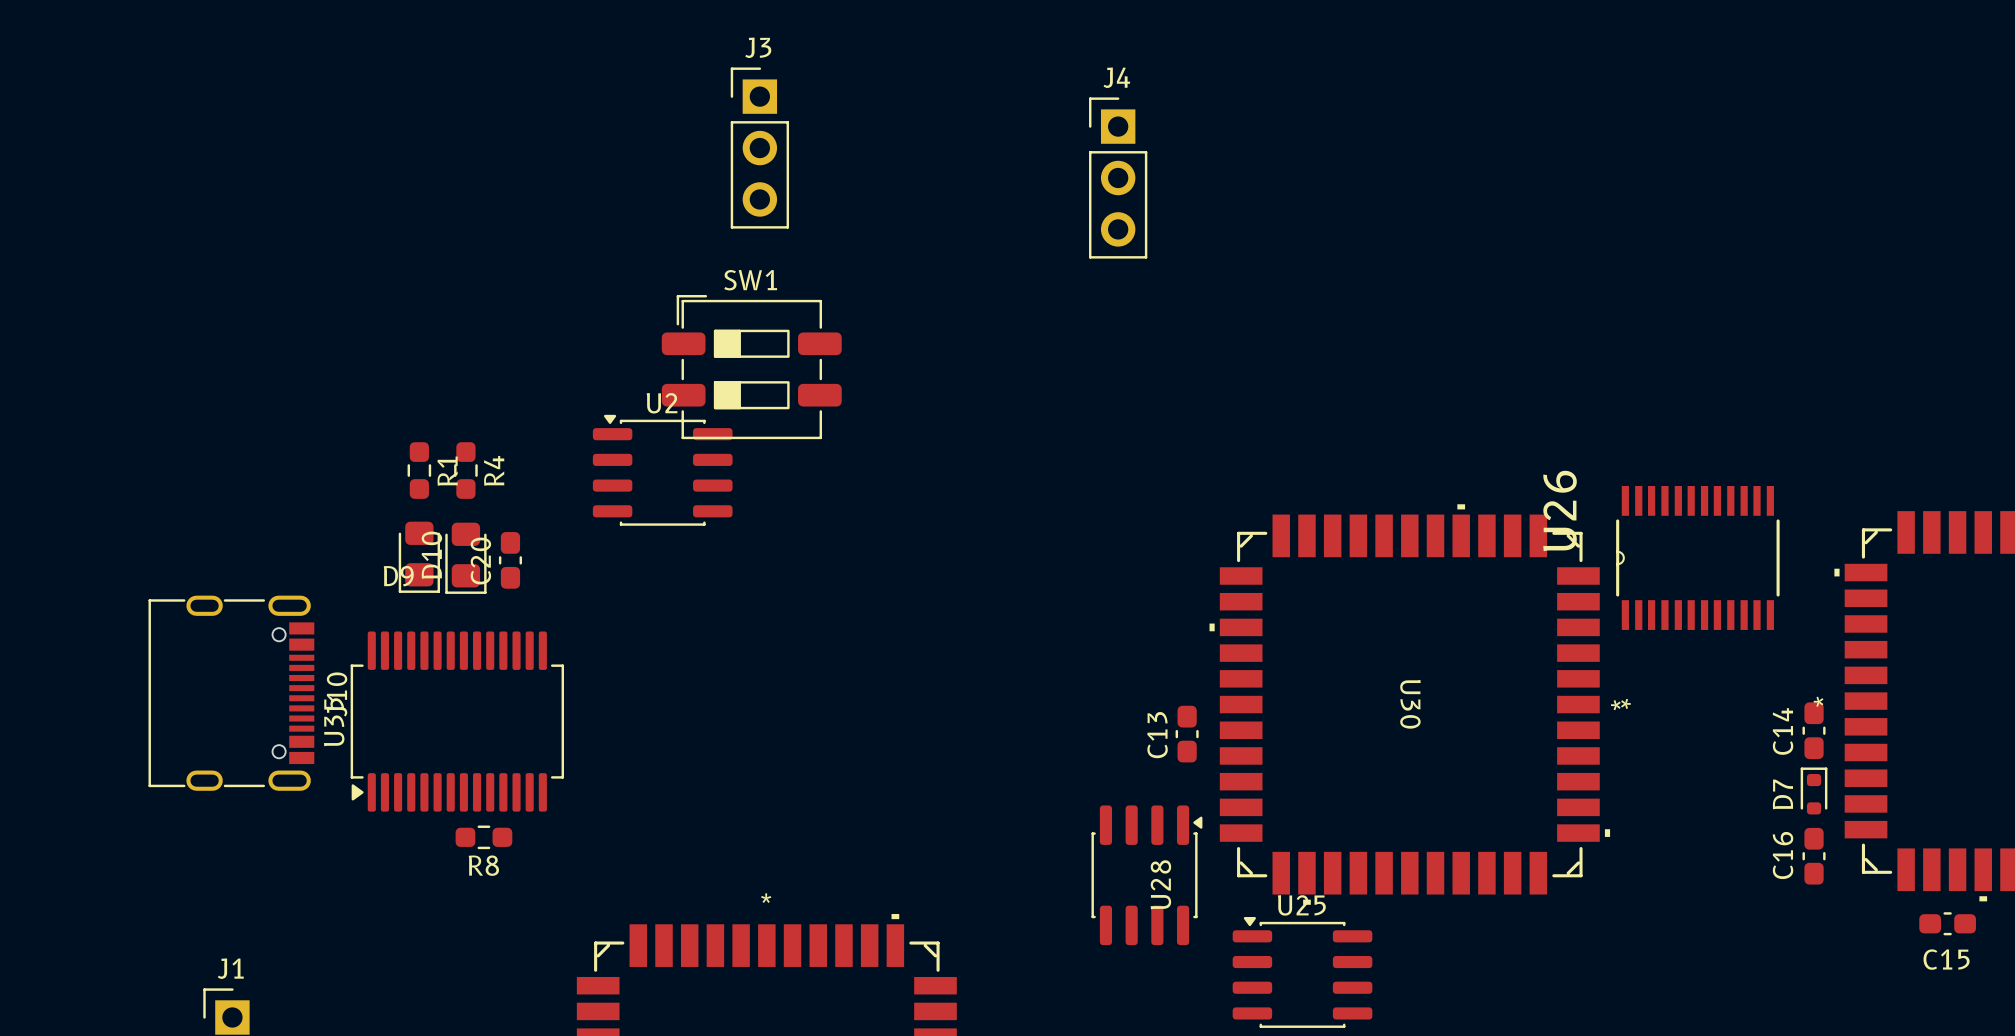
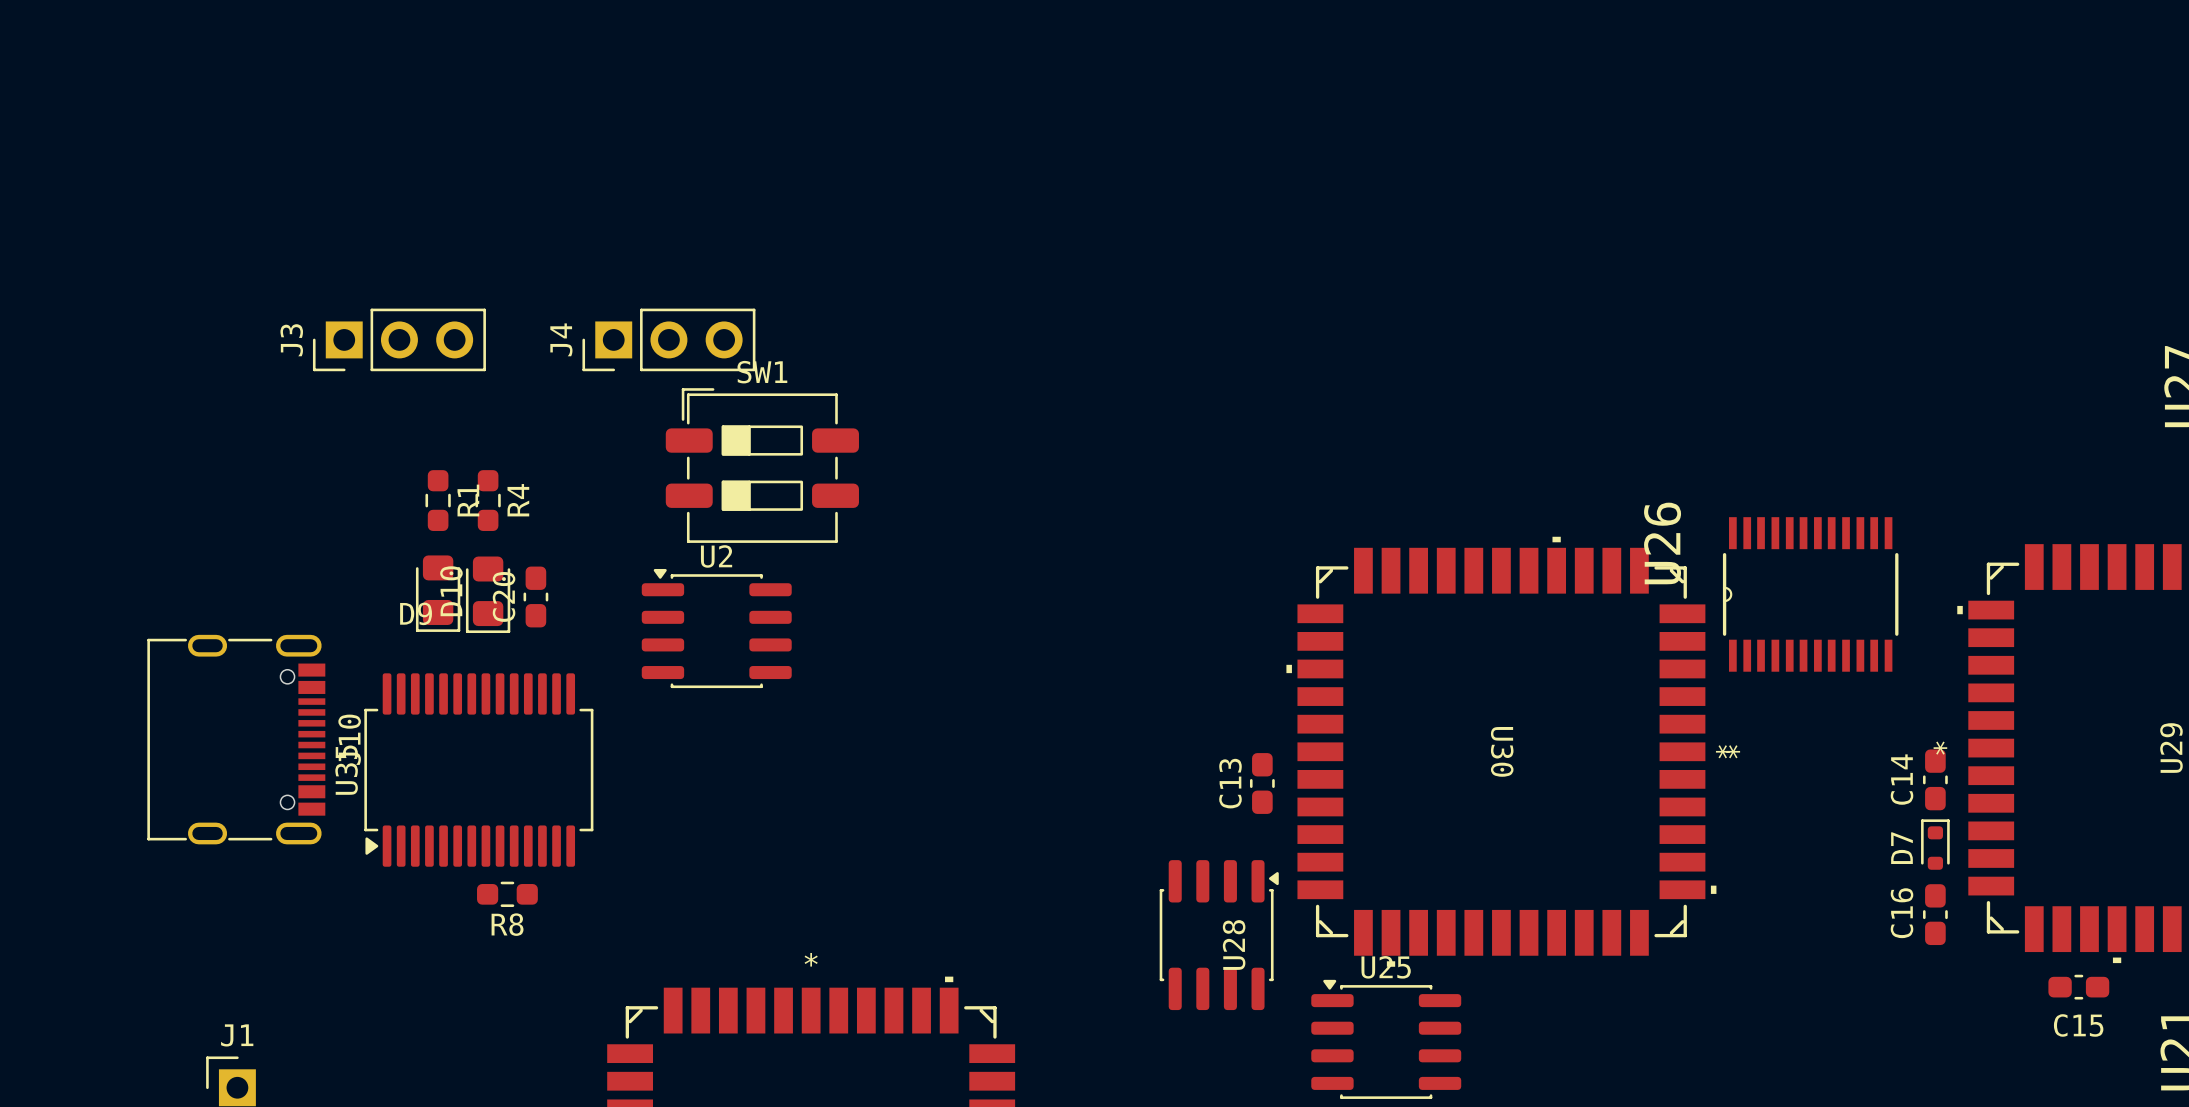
J3 rotation: 0° (759, 148) -> 90° counterclockwise (399, 339)
J3 position: (759, 148) -> (399, 339)
J4 rotation: 0° (1118, 178) -> 90° counterclockwise (668, 339)
J4 position: (1118, 178) -> (668, 339)
SW1 position: (751, 367) -> (762, 465)
U2 position: (662, 470) -> (716, 628)

